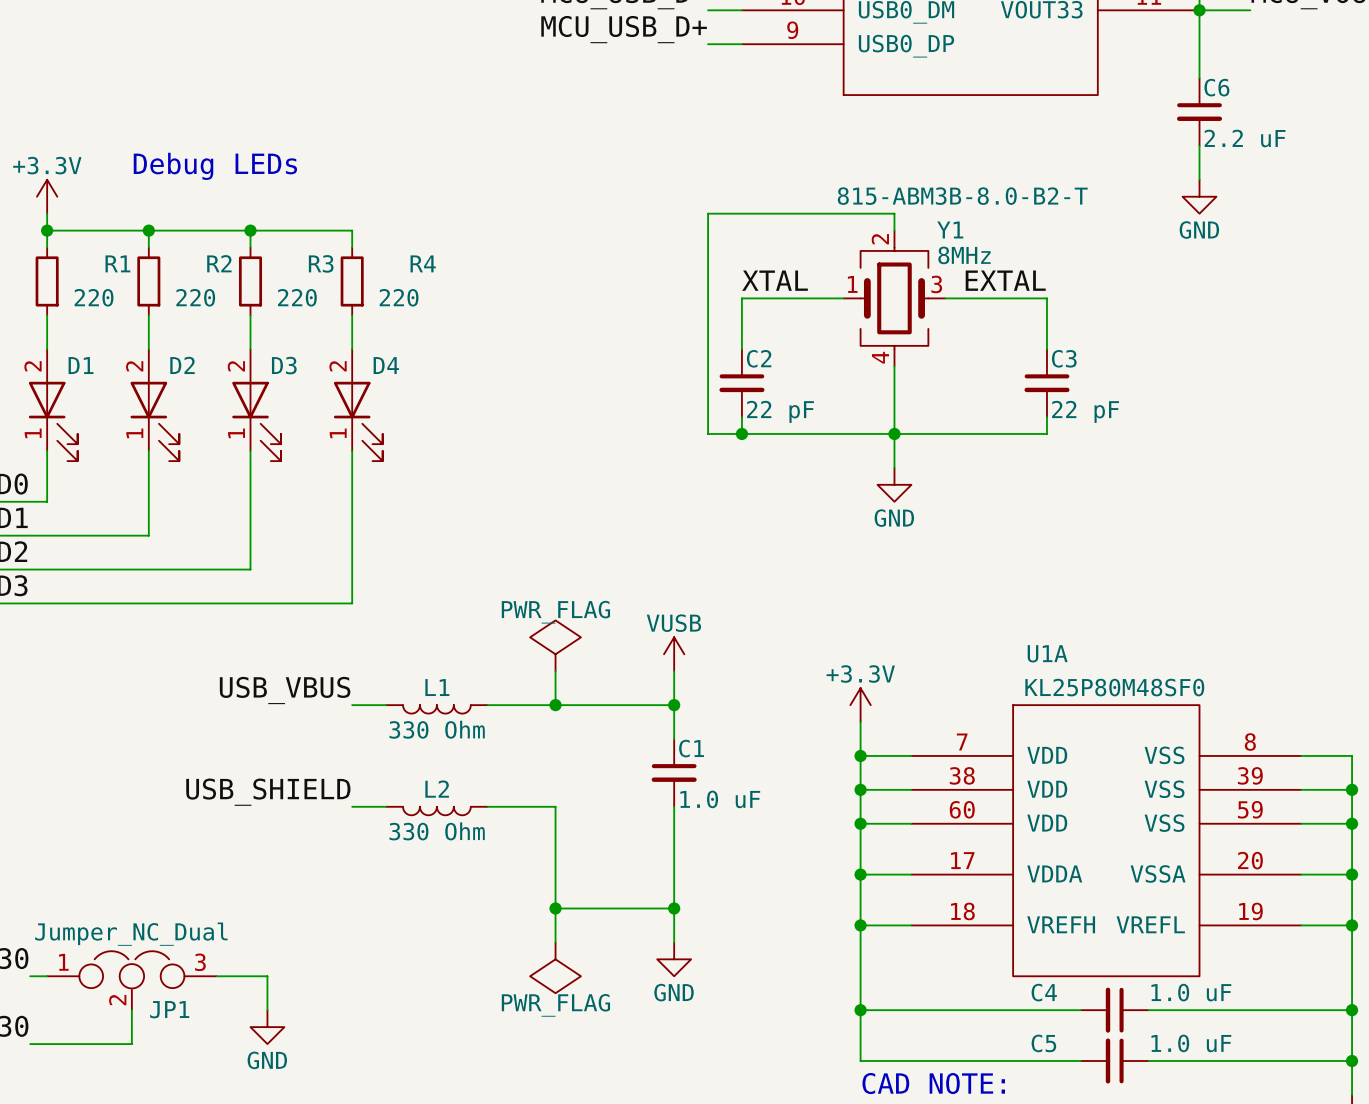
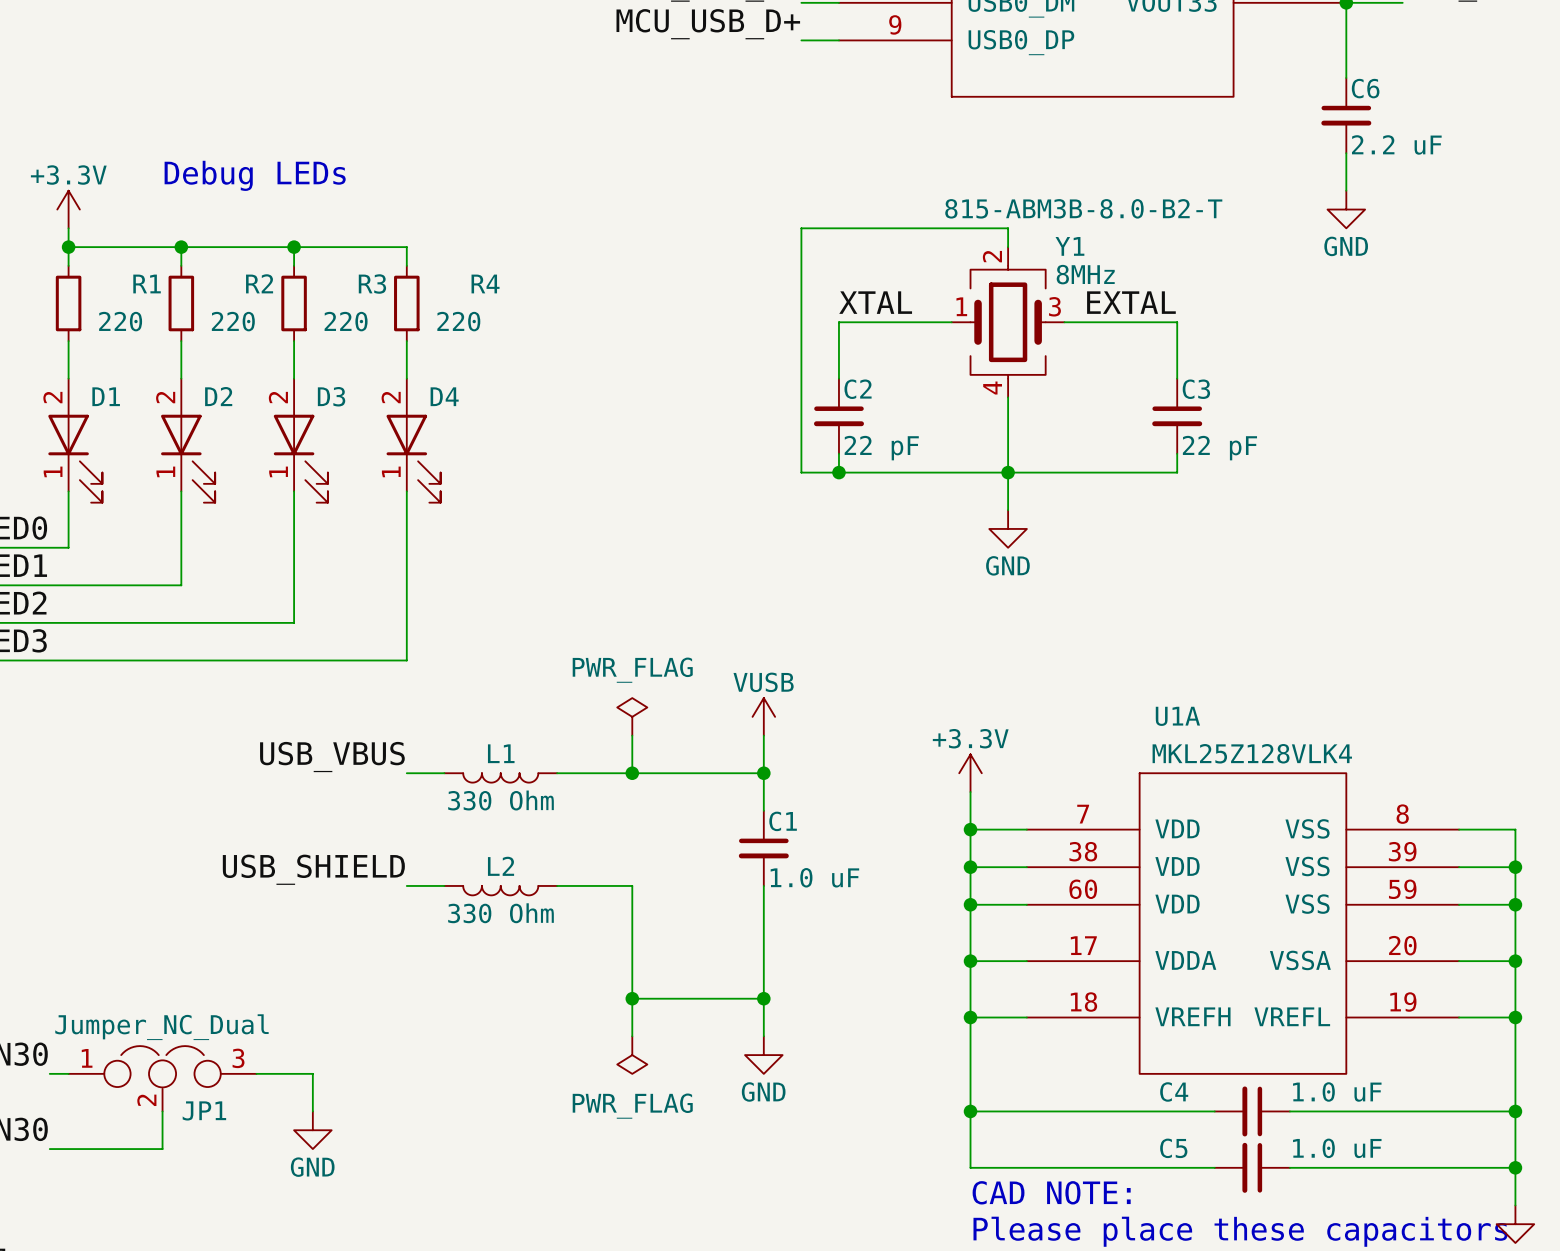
power symbol shape: [530, 620, 581, 672] -> [617, 698, 648, 736]
U1A value: KL25P80M48SF0 (1114, 687) -> MKL25Z128VLK4 (1252, 753)
power symbol shape: [530, 942, 581, 994] -> [617, 1036, 648, 1074]

